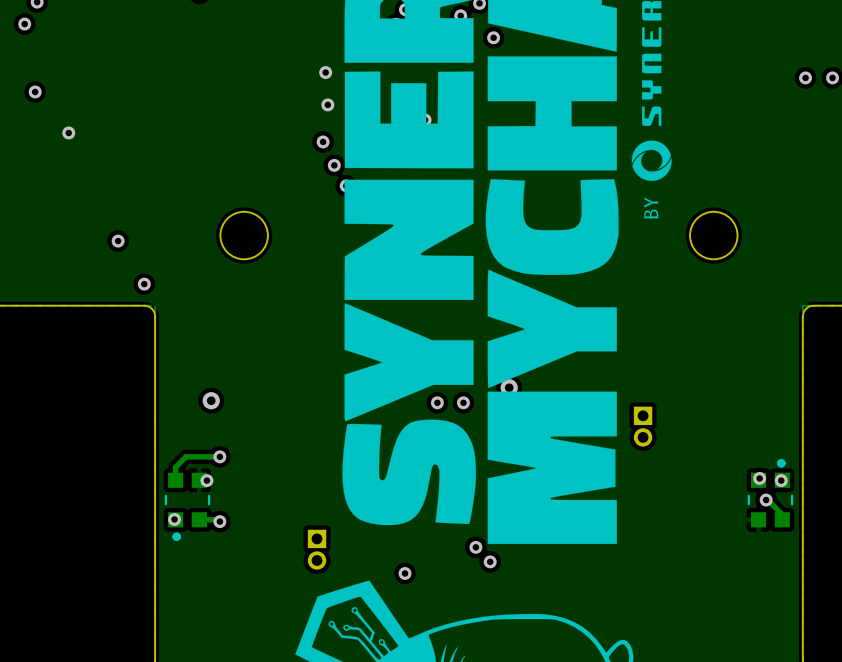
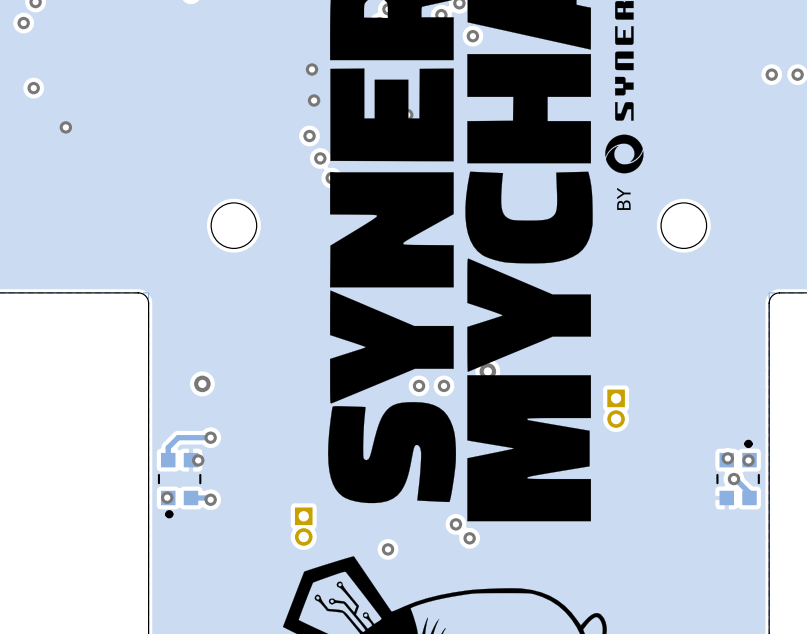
via: (118, 241) -> none
via: (144, 284) -> none

